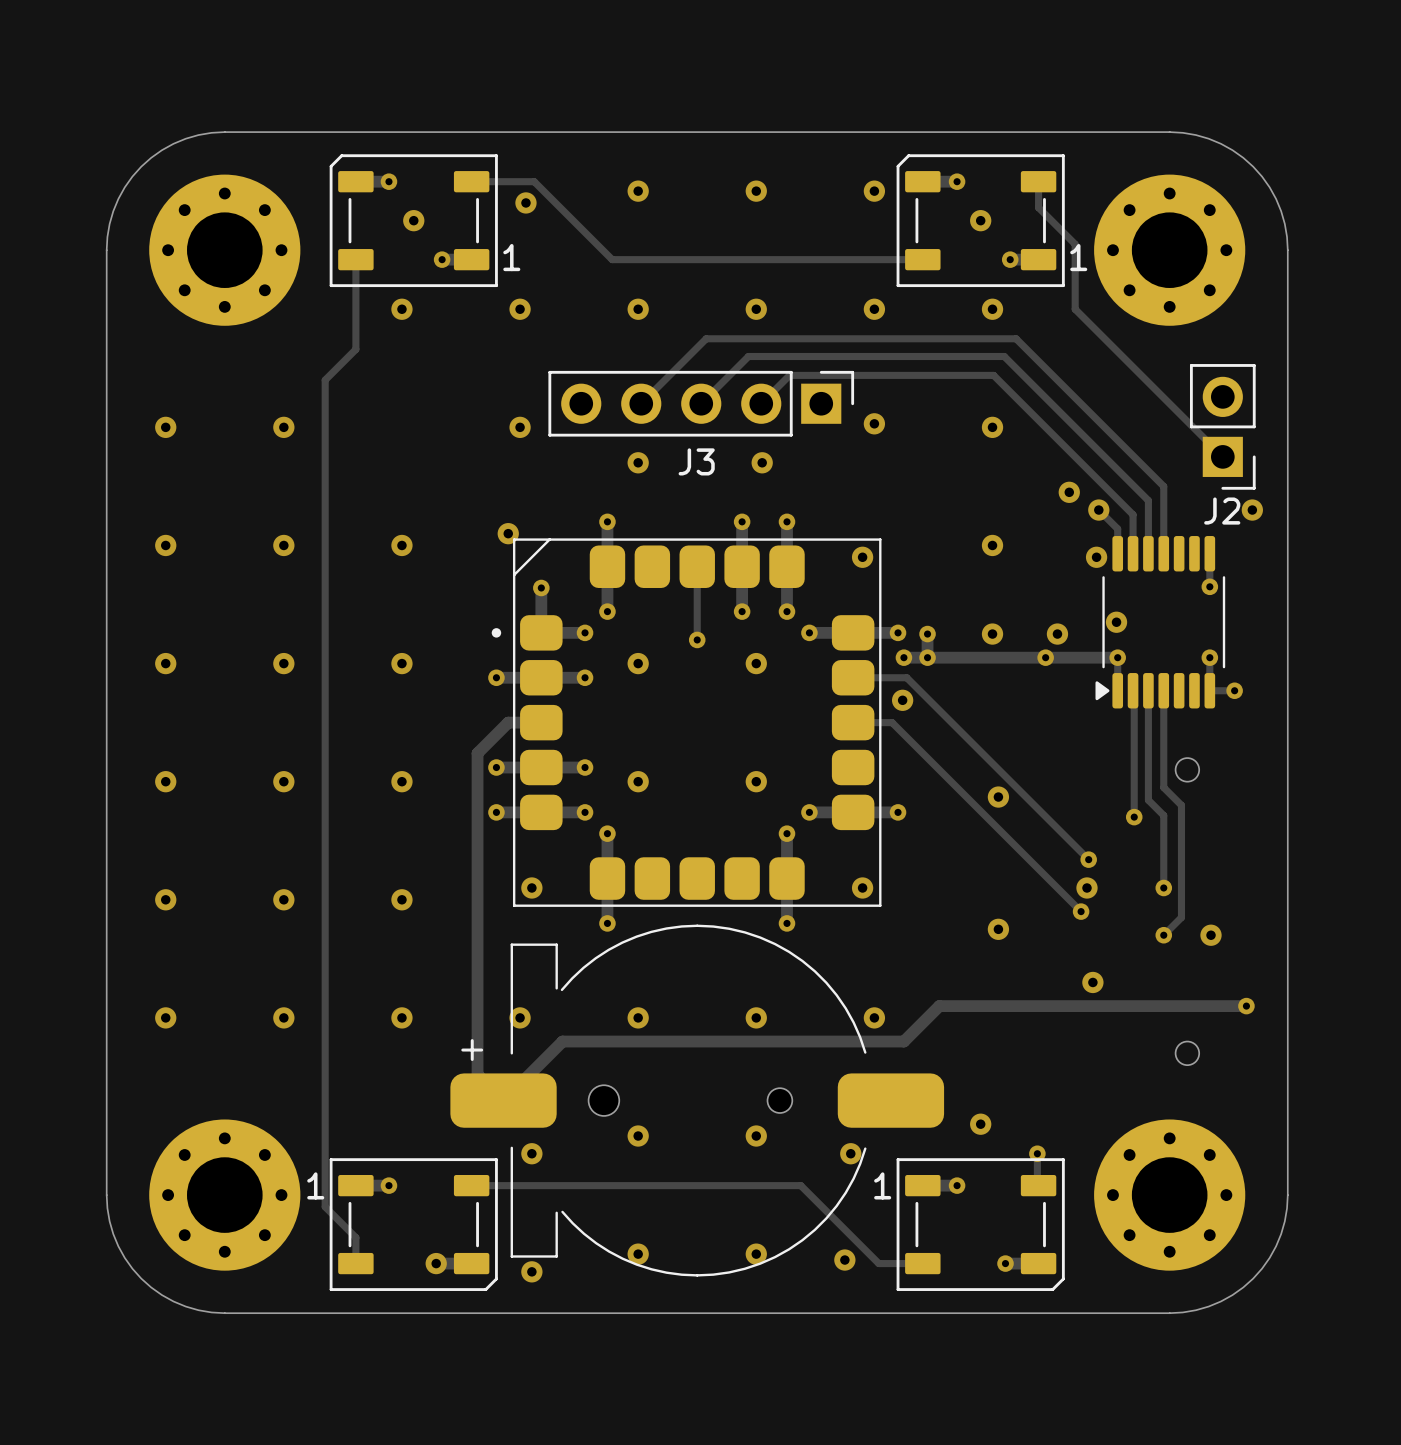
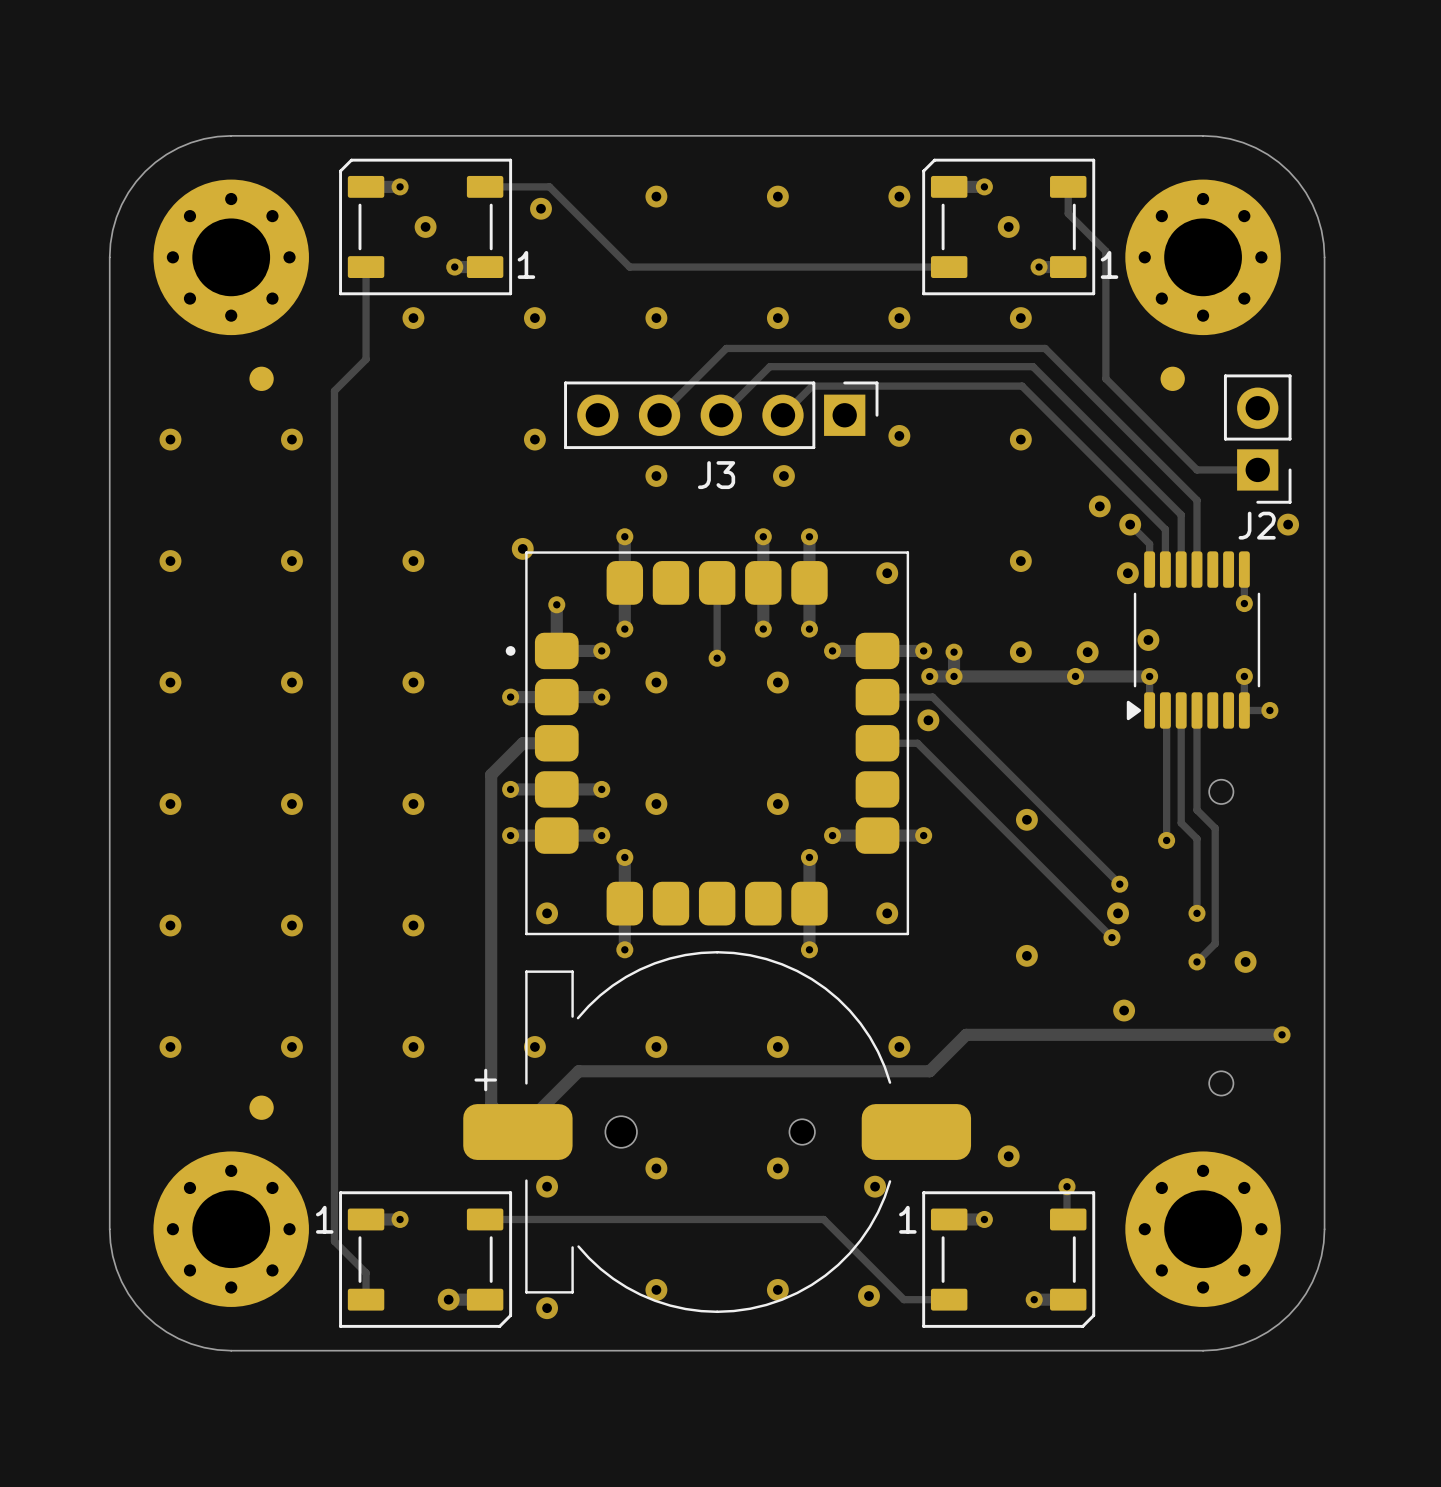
track: (1075, 309) (1222, 456) -> (1105, 318) (1105, 378) (1197, 469) (1257, 469)
part: none -> (261, 378)
part: none -> (1172, 378)
part footprint: [491, 538, 882, 907] -> [505, 551, 910, 936]
part: none -> (261, 1107)

